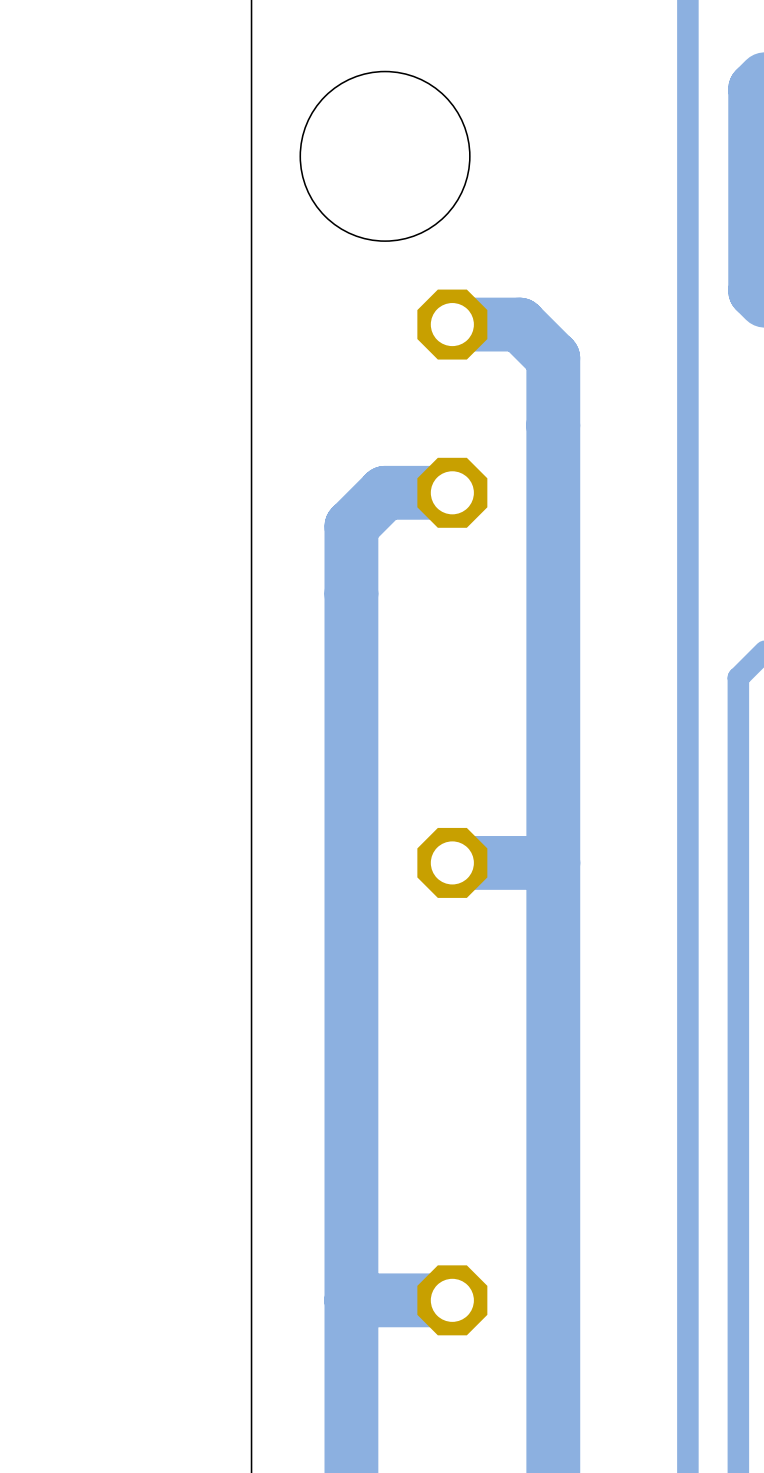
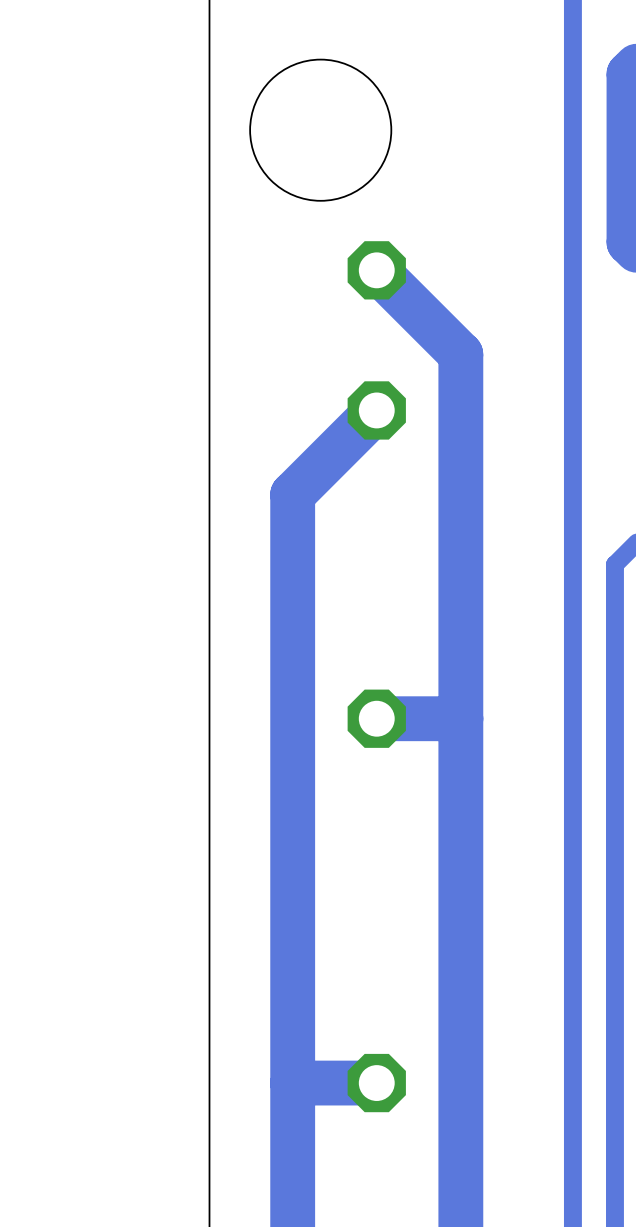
bottom track: (452, 324) (519, 324) (553, 358) (553, 425) -> (376, 270) (460, 354)
bottom track: (452, 492) (385, 492) (351, 526) (351, 593) -> (376, 410) (292, 494)

